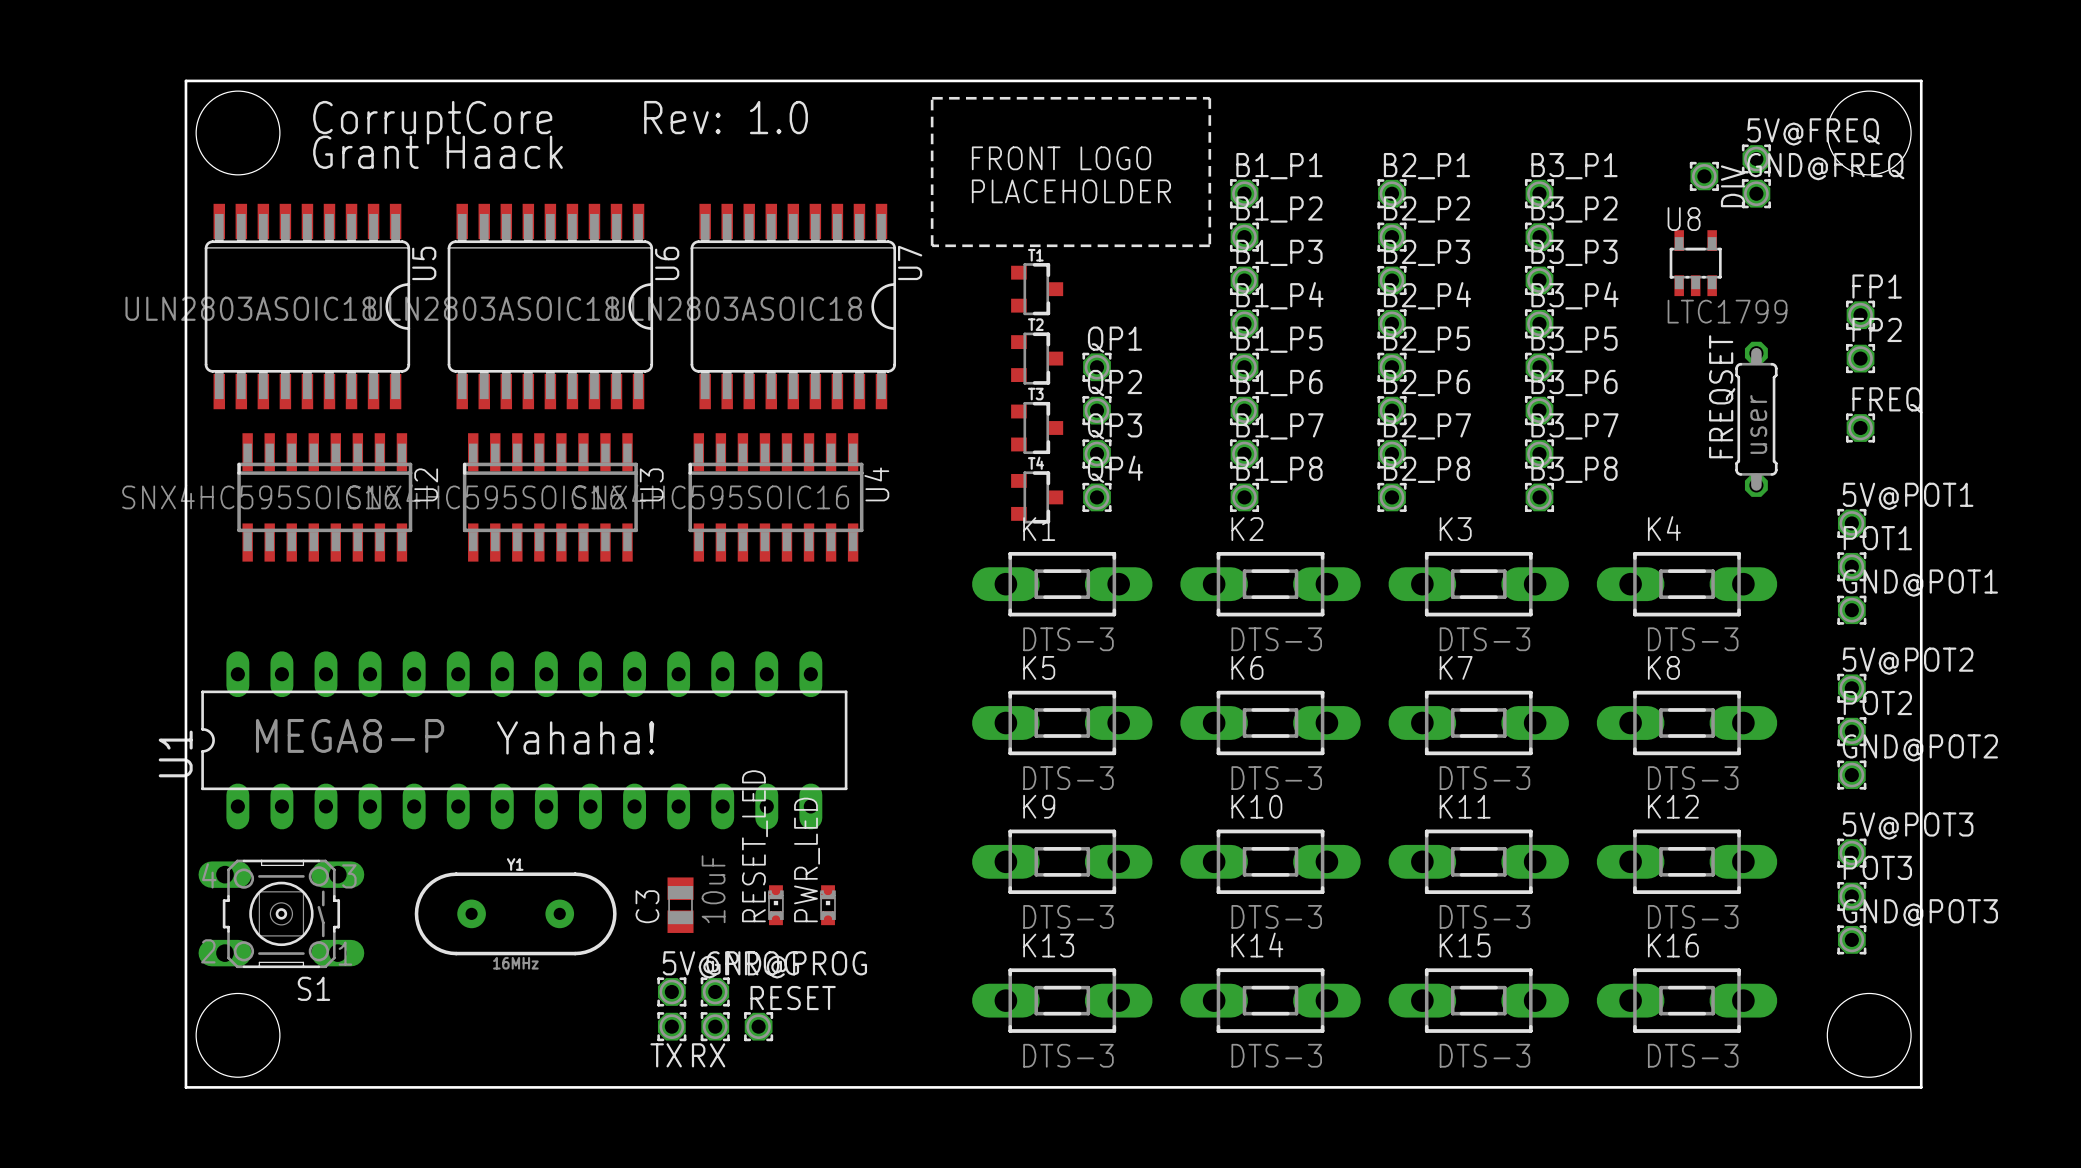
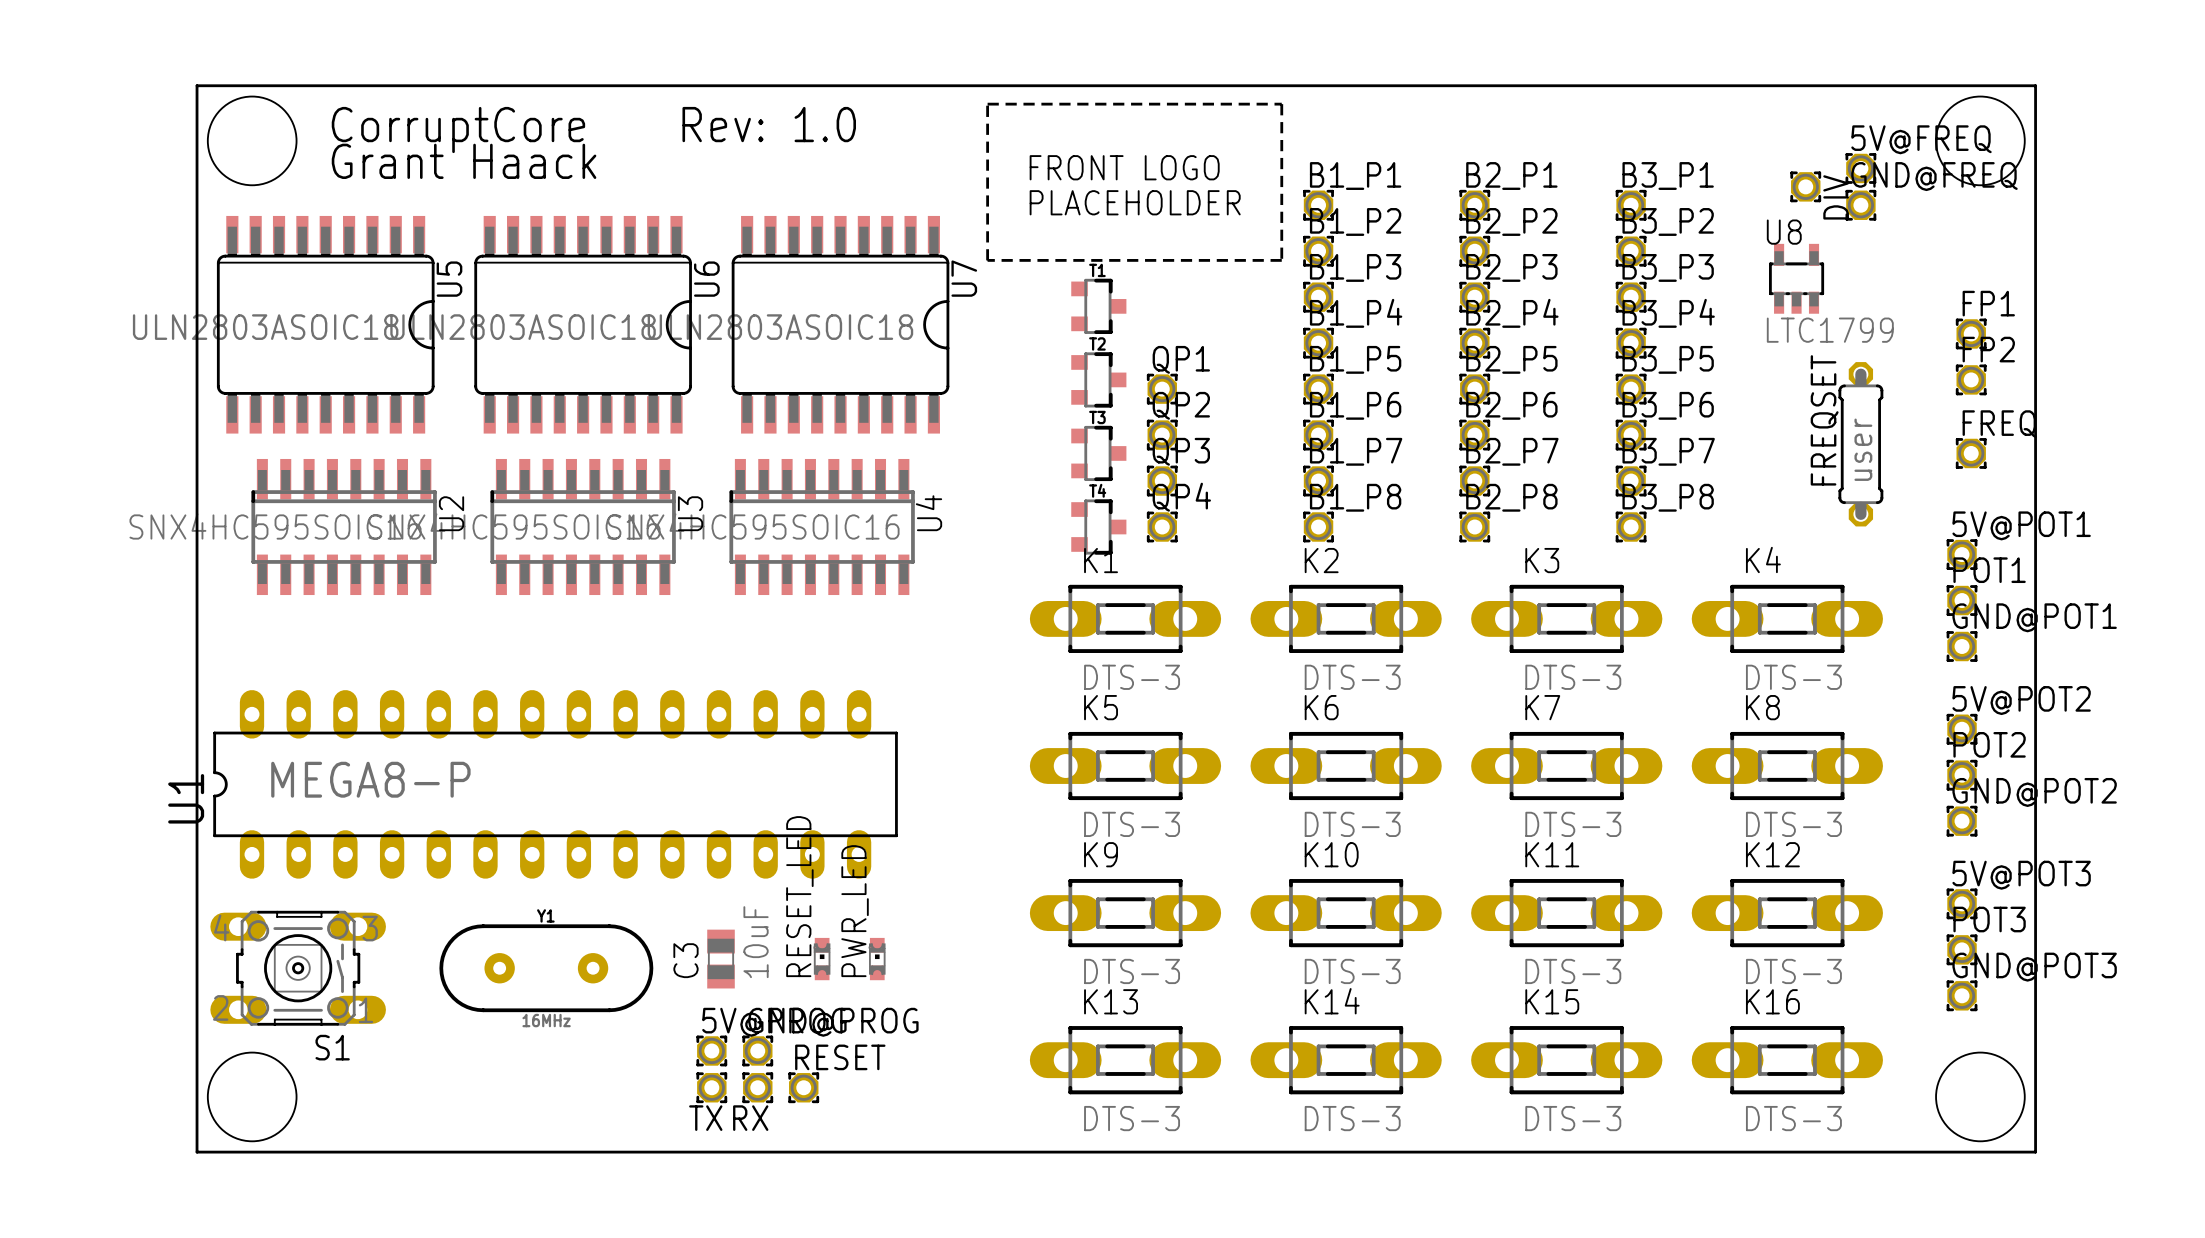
text: Yahaha! (575, 737) -> none

